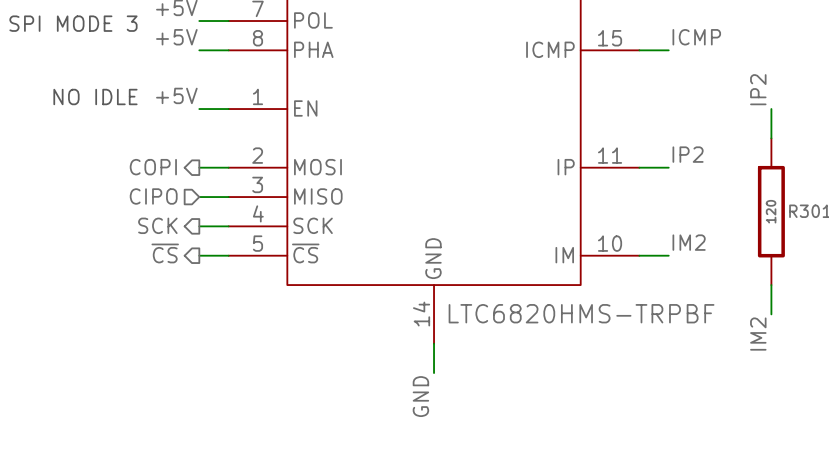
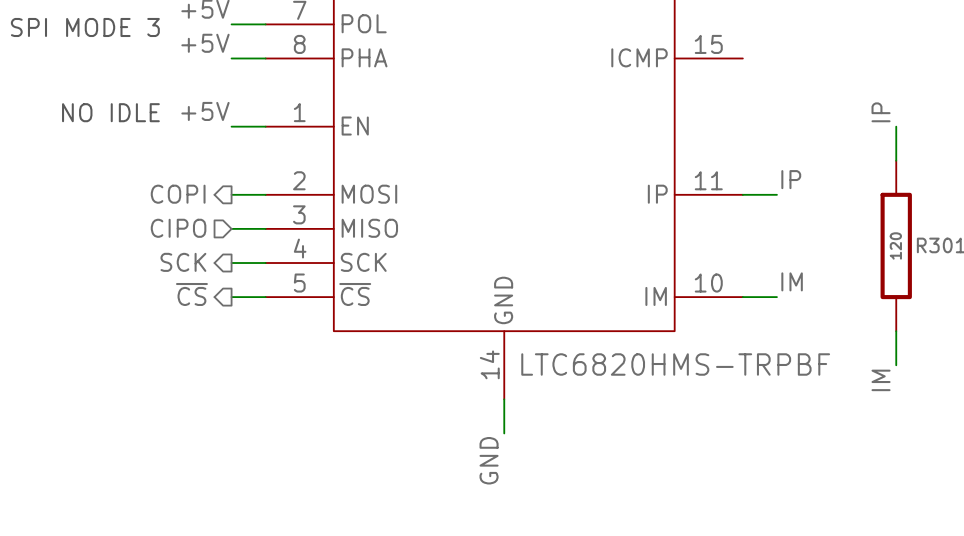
label: ICMP (696, 37) -> none
wire: (639, 50) (668, 50) -> none
label: IP2 (758, 89) -> IP (881, 112)
label: IP2 (688, 154) -> IP (791, 179)
label: IM2 (689, 242) -> IM (792, 281)
label: IM2 (758, 334) -> IM (881, 380)

